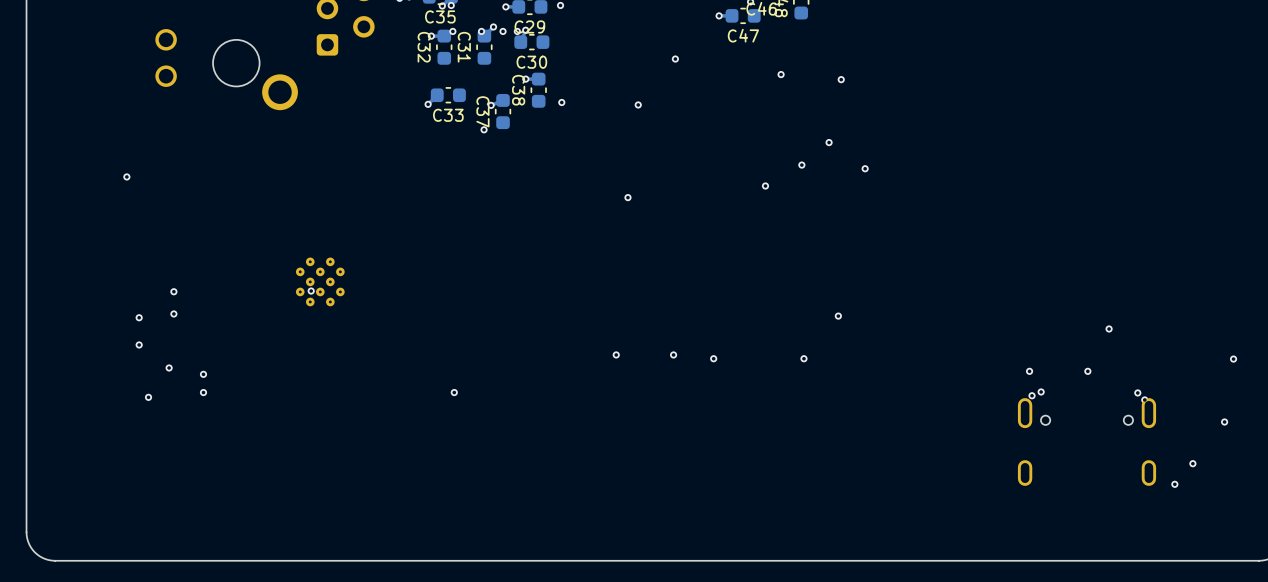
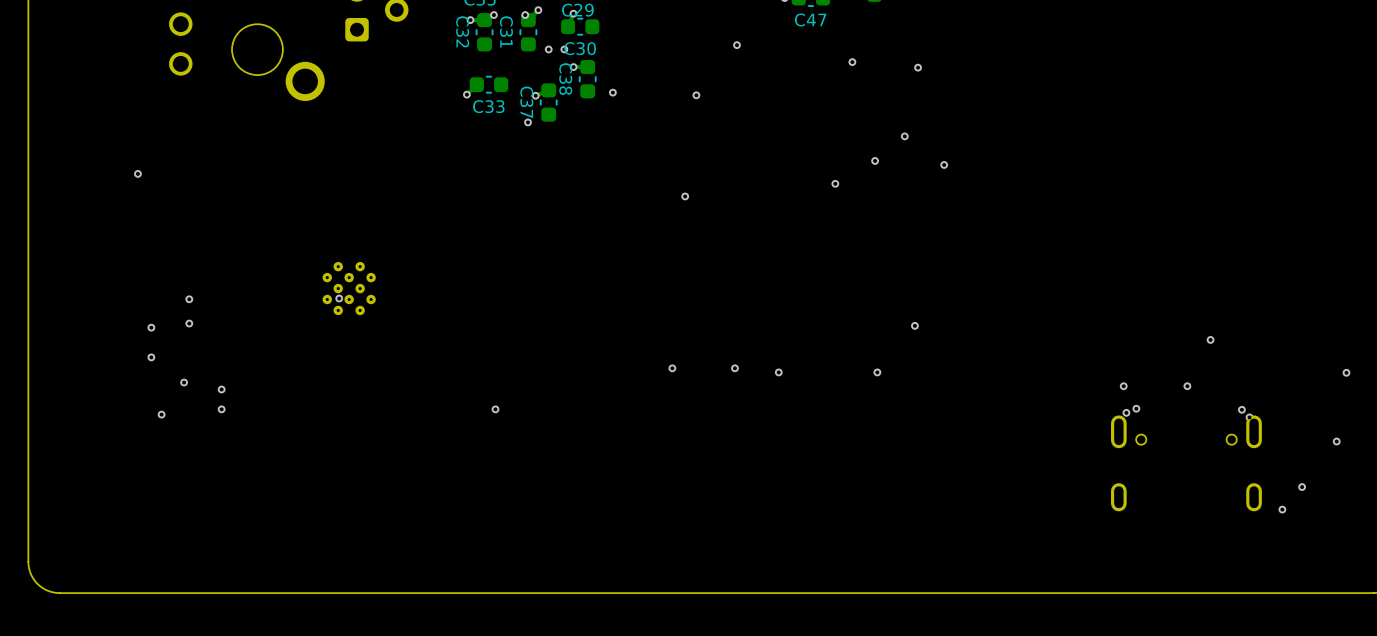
via: (503, 31) -> none
via: (517, 31) -> none
via: none -> (548, 49)
via: none -> (564, 49)

